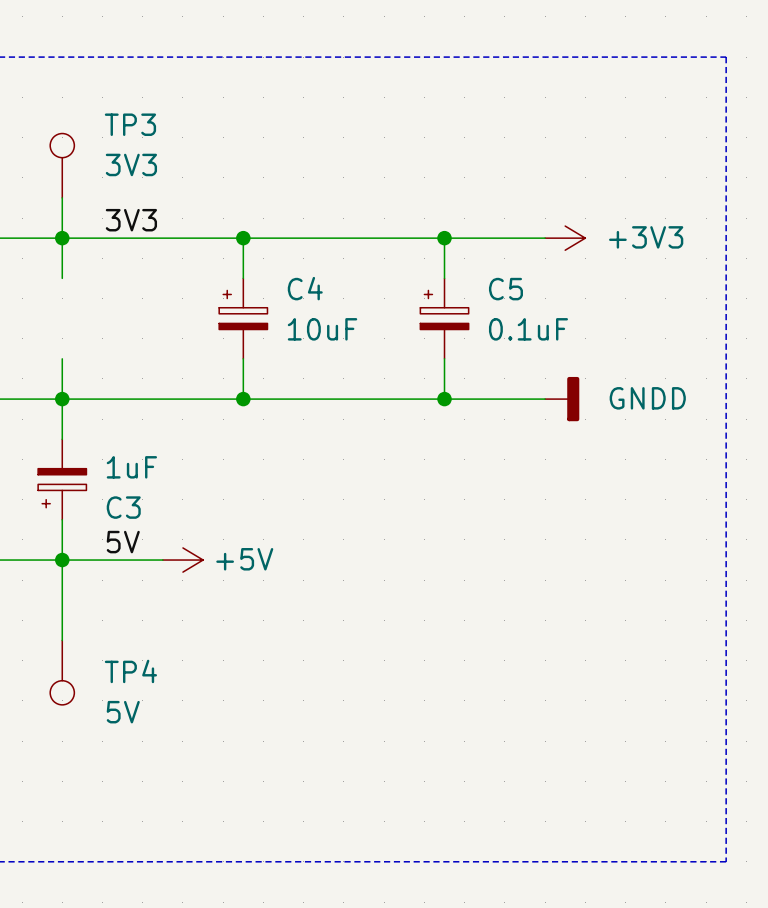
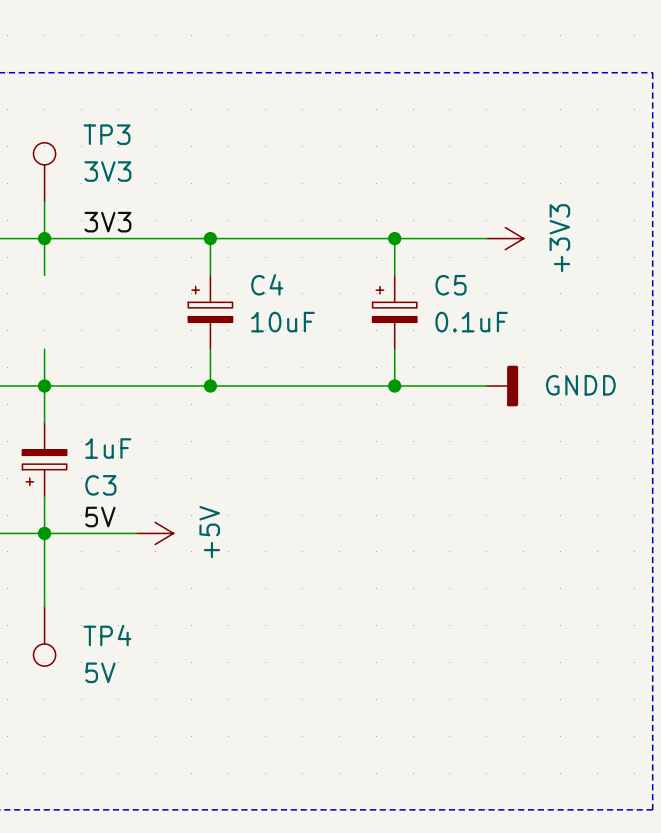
power symbol text rotation: 0° (646, 237) -> 90° counterclockwise (559, 238)
power symbol text rotation: 0° (244, 559) -> 90° counterclockwise (209, 532)

